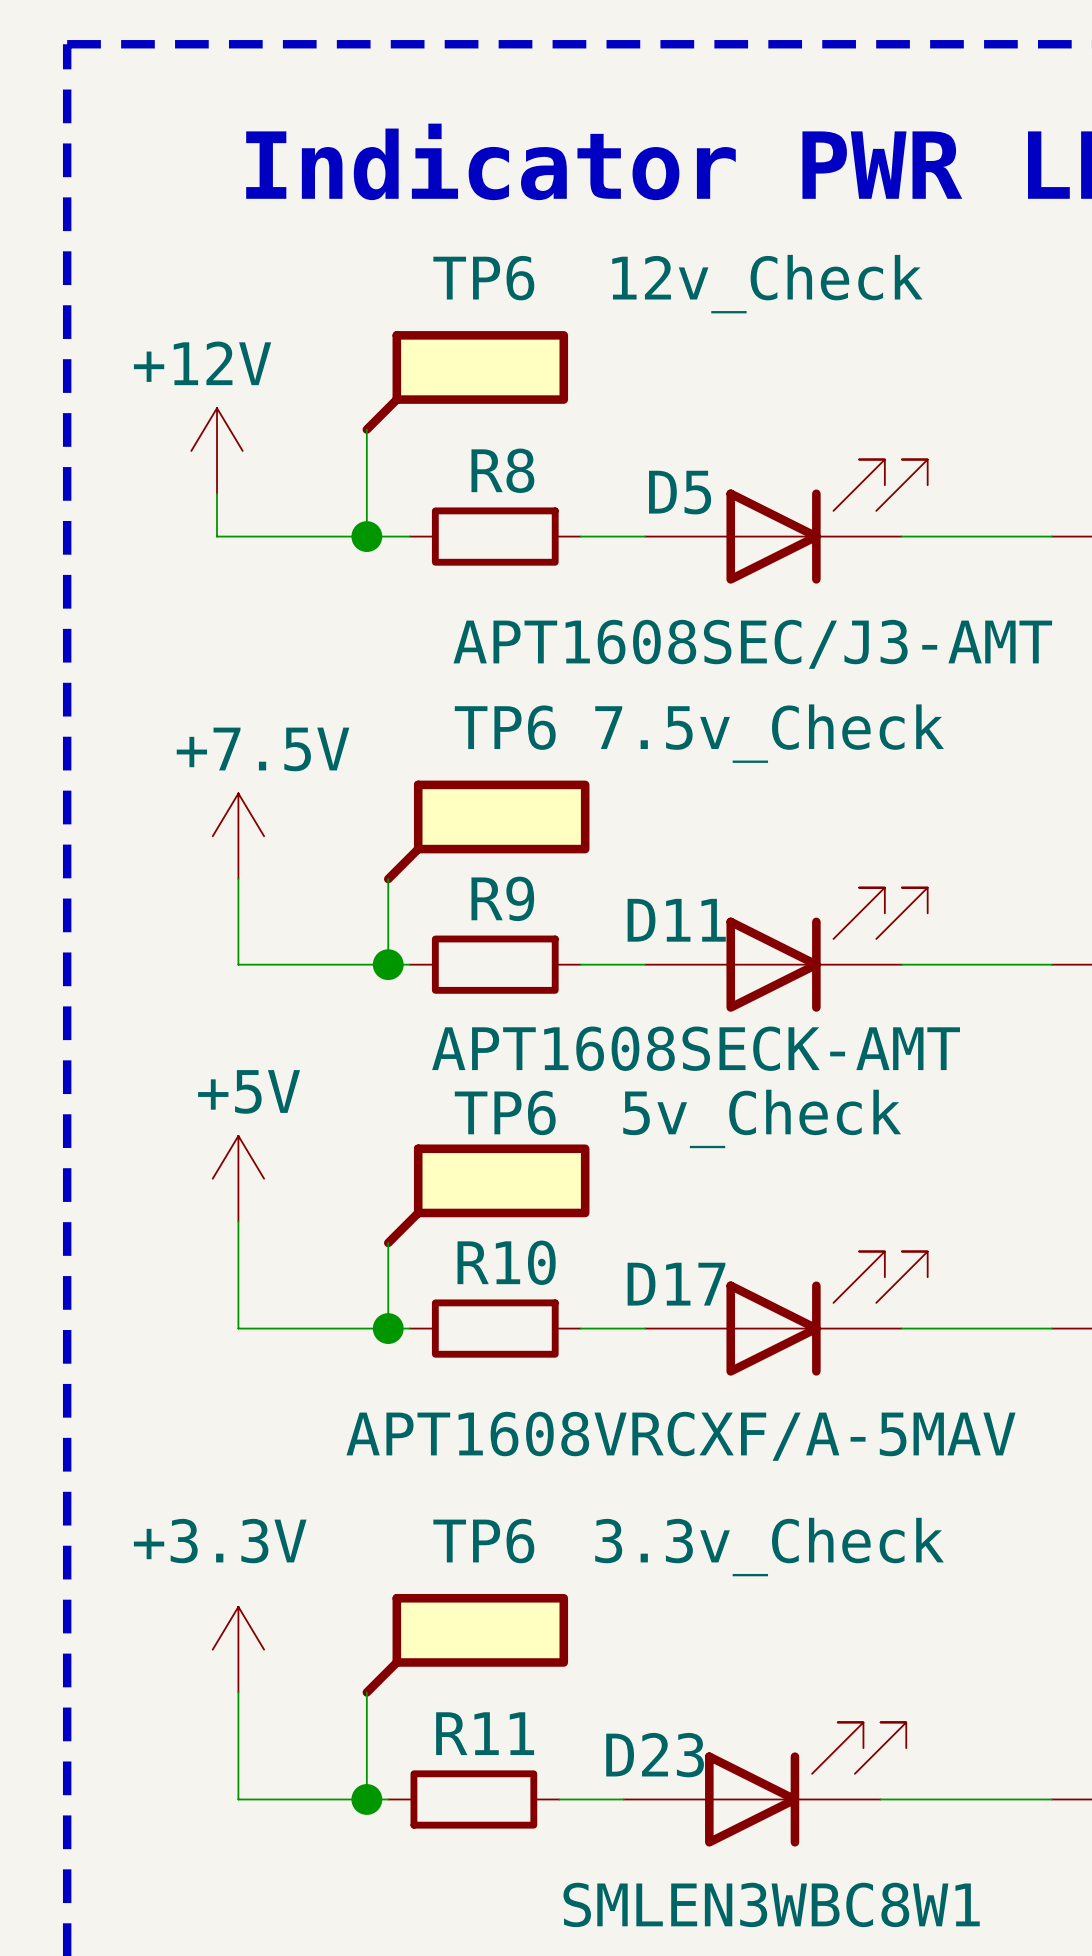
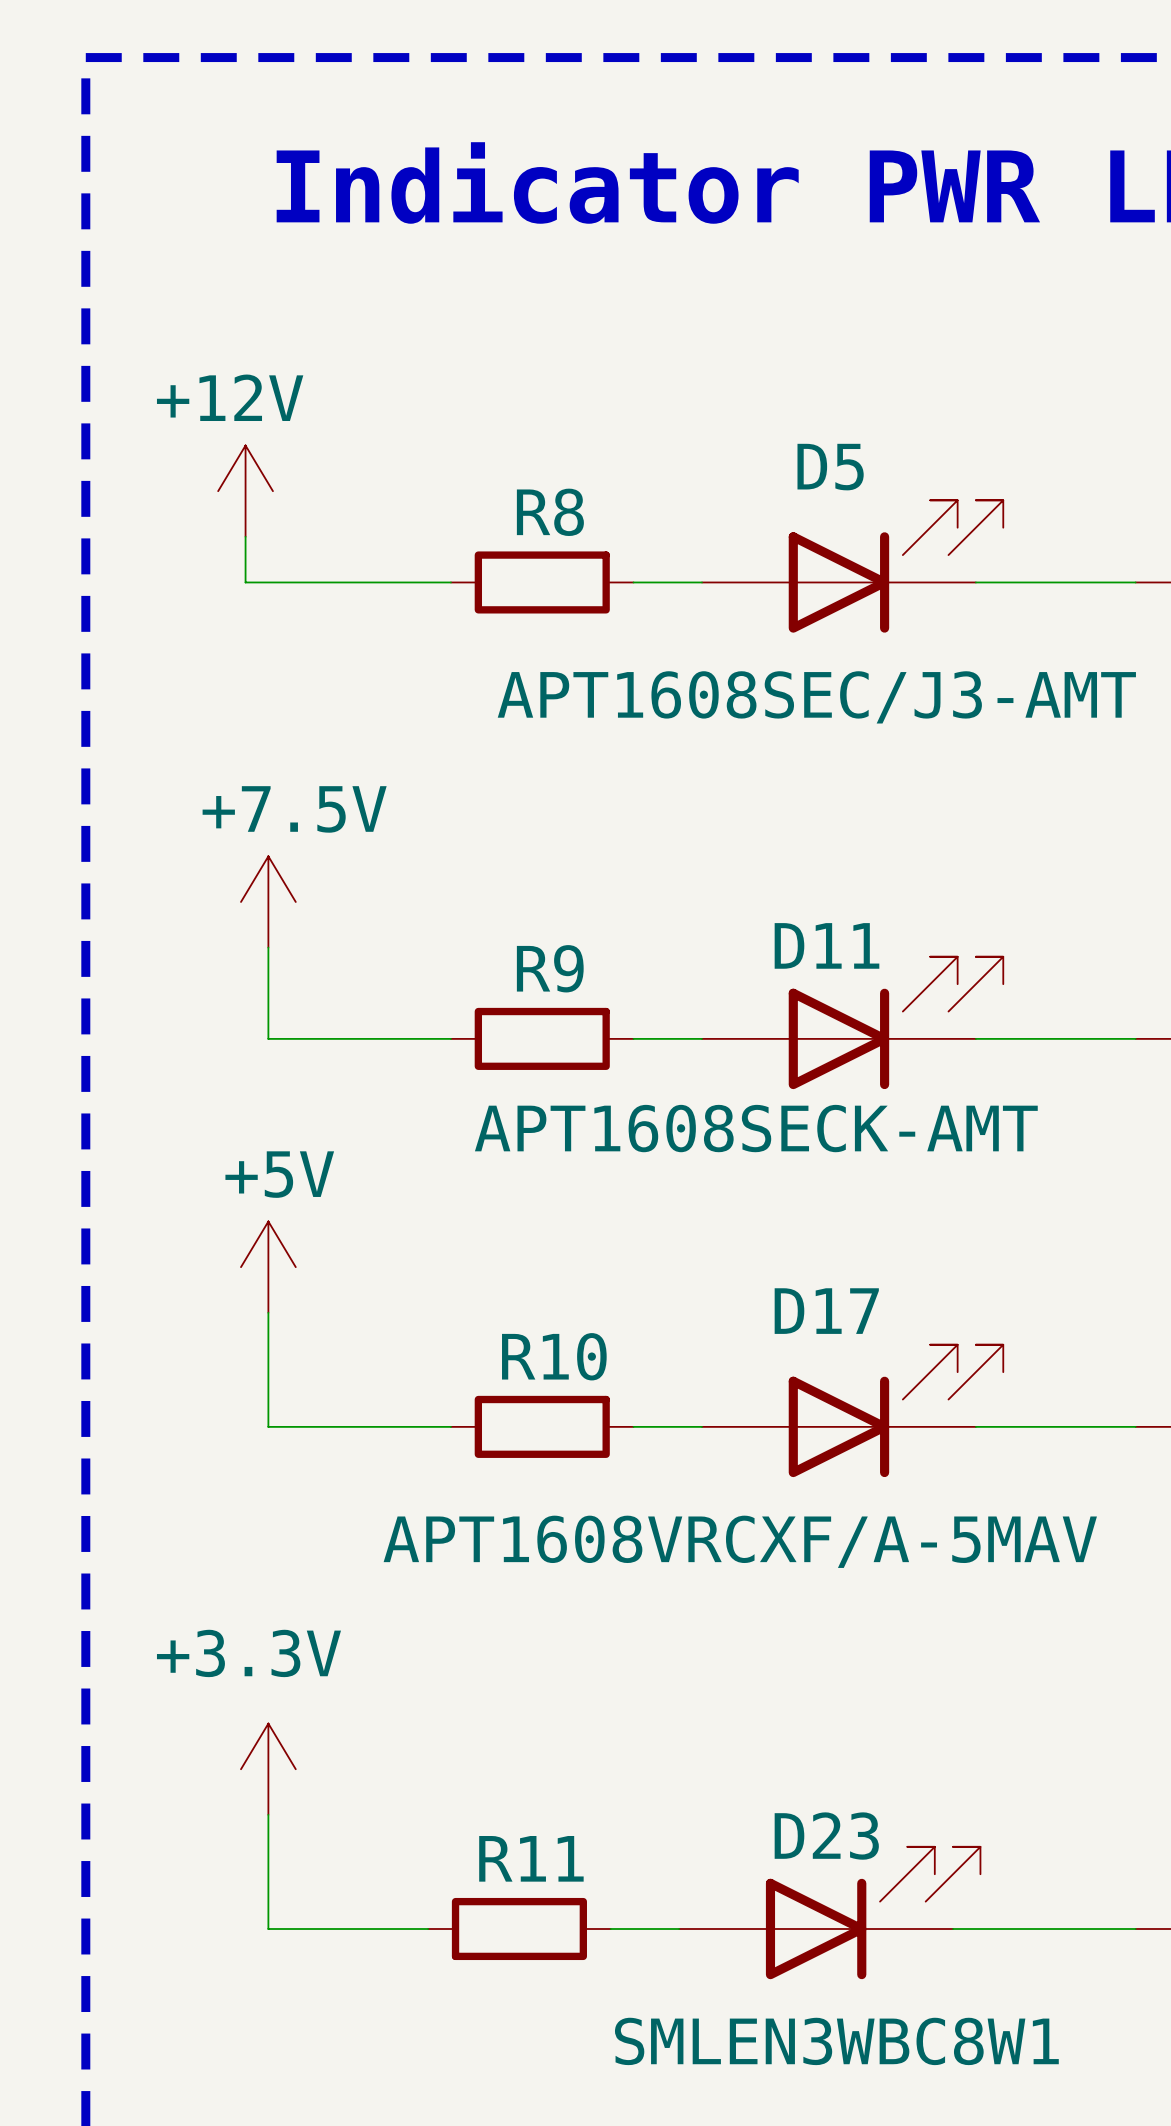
TP6: 12v_Check (465, 382) -> none
wire: (366, 429) (366, 536) -> none
D5 name position: D5 (680, 492) -> D5 (830, 467)
junction: (366, 536) -> none
TP6: 7.5v_Check (486, 831) -> none
wire: (388, 879) (388, 964) -> none
D11 name position: D11 (676, 920) -> D11 (826, 945)
junction: (388, 964) -> none
TP6: 5v_Check (486, 1195) -> none
wire: (388, 1242) (388, 1328) -> none
D17 name position: D17 (676, 1284) -> D17 (826, 1311)
junction: (388, 1328) -> none
TP6: 3.3v_Check (465, 1645) -> none
wire: (366, 1692) (366, 1799) -> none
D23 name position: D23 (655, 1755) -> D23 (826, 1836)
junction: (366, 1799) -> none

